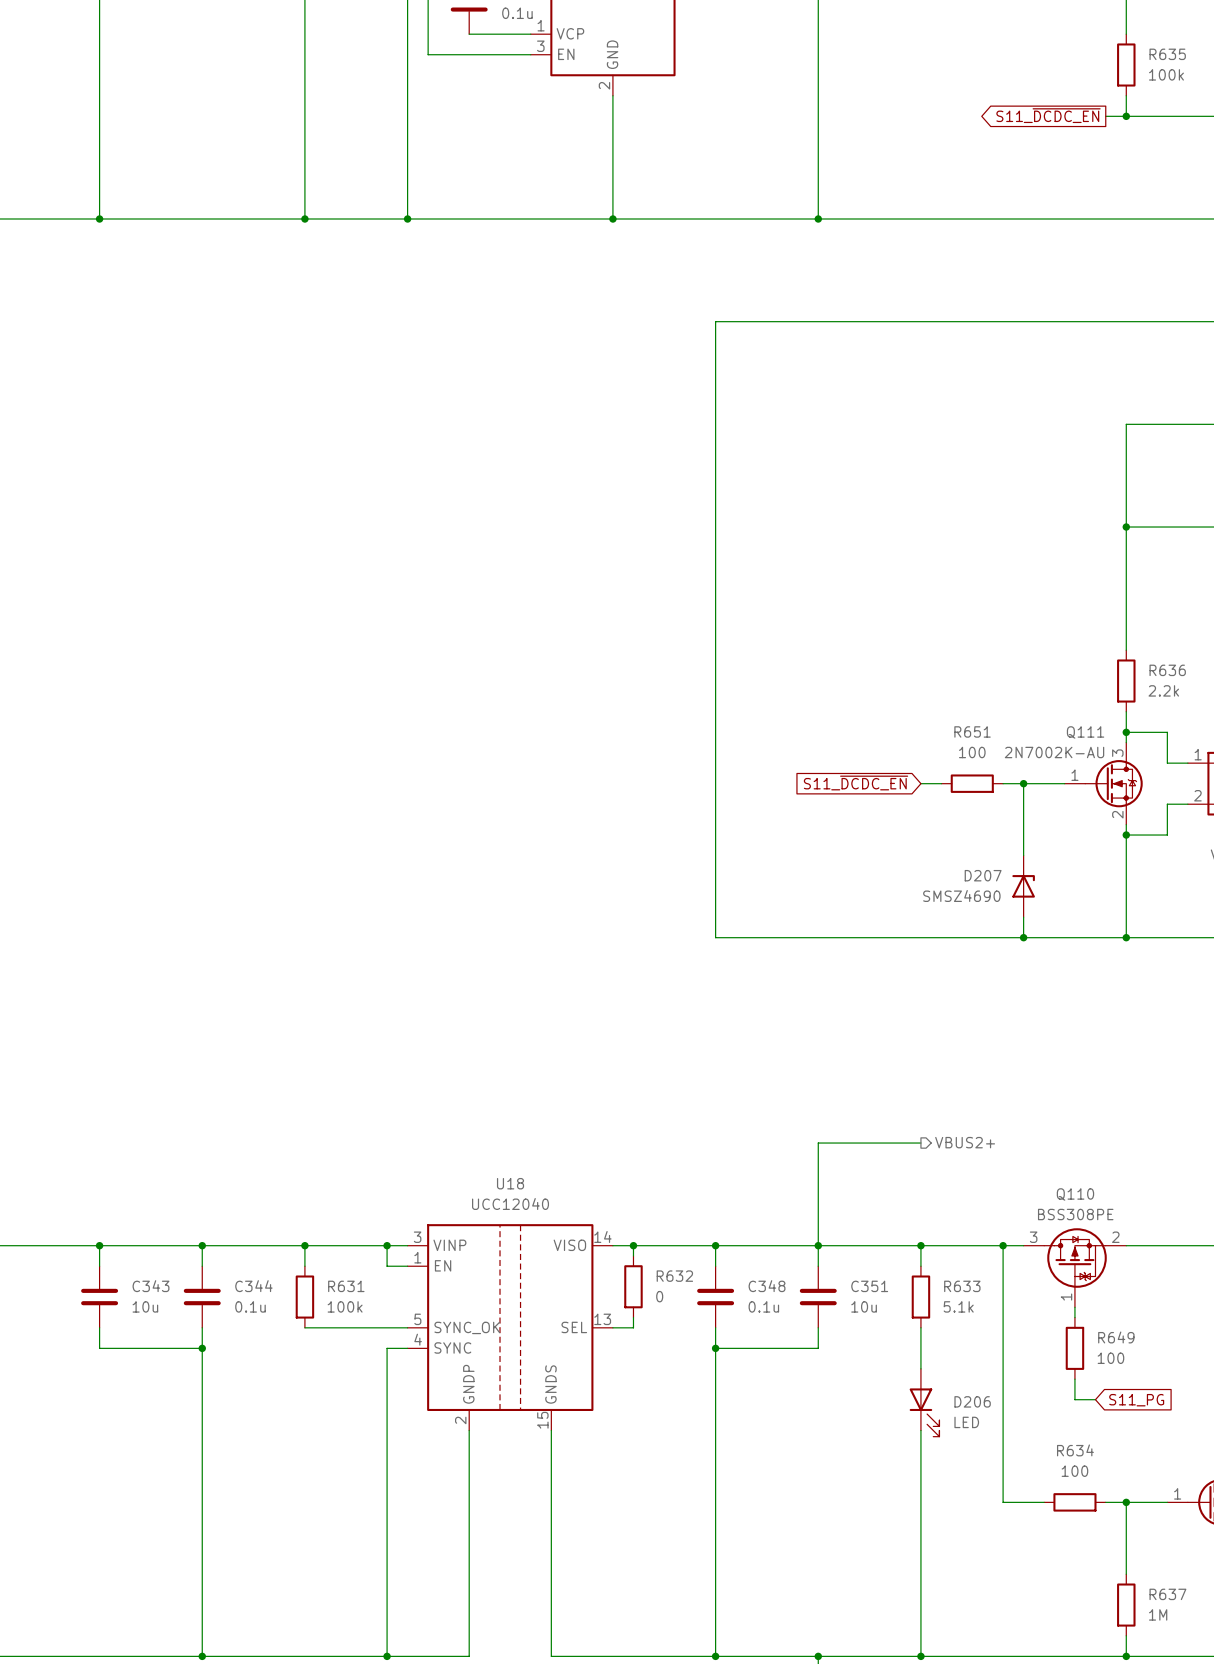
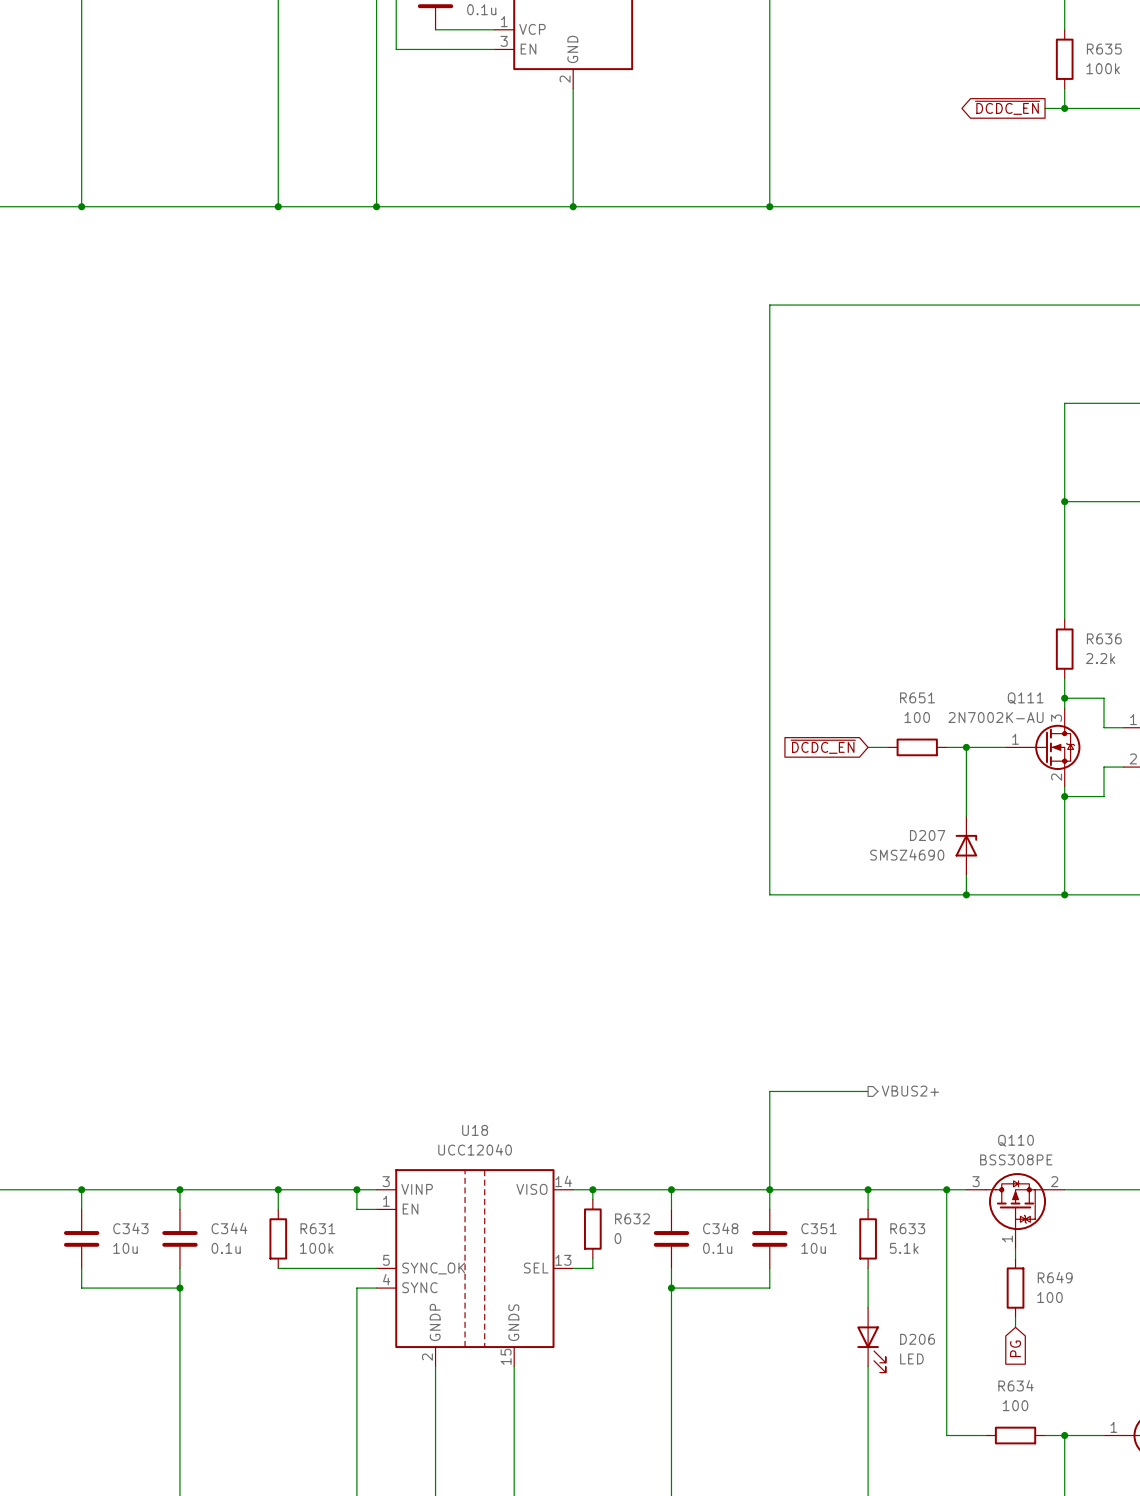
global label: S11_~{DCDC_EN} (1048, 115) -> ~{DCDC_EN} (1007, 107)
wire: (818, 321) (715, 321) (715, 937) (818, 937) -> (769, 305) (769, 894)
global label: S11_~{DCDC_EN} (856, 782) -> ~{DCDC_EN} (823, 746)
wire: (1074, 1389) (1074, 1399) (1095, 1399) -> none
global label: S11_PG (1136, 1400) -> none
global label: none -> PG (1015, 1348)

